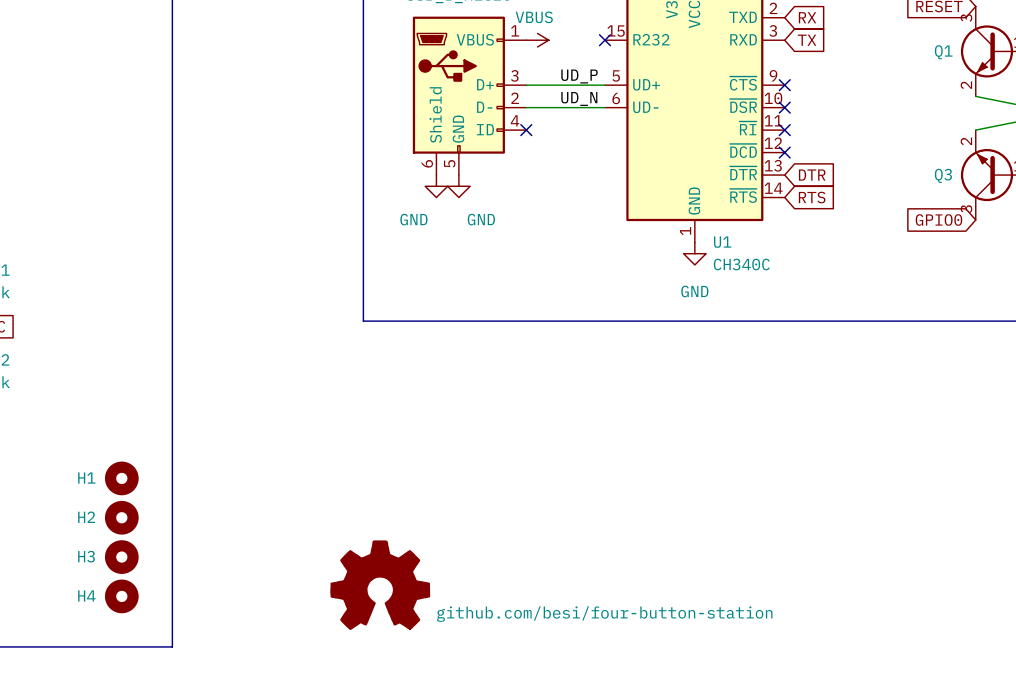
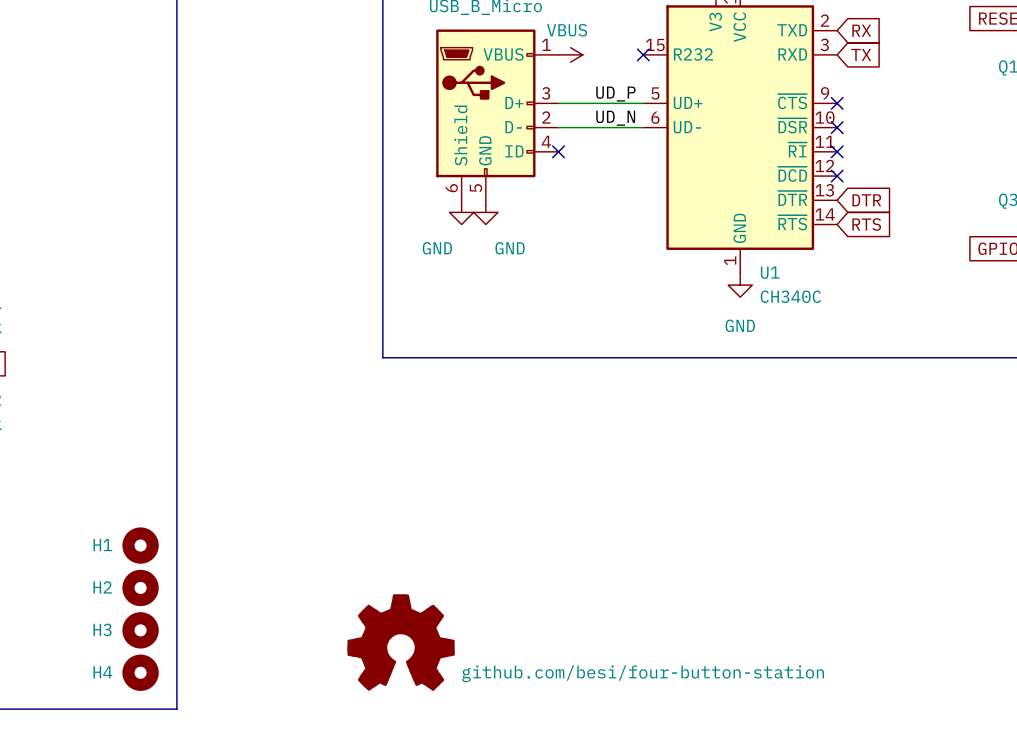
H1 position: (121, 478) -> (140, 545)
H2 position: (121, 517) -> (140, 587)
H3 position: (121, 557) -> (140, 630)
H4 position: (121, 596) -> (140, 672)

